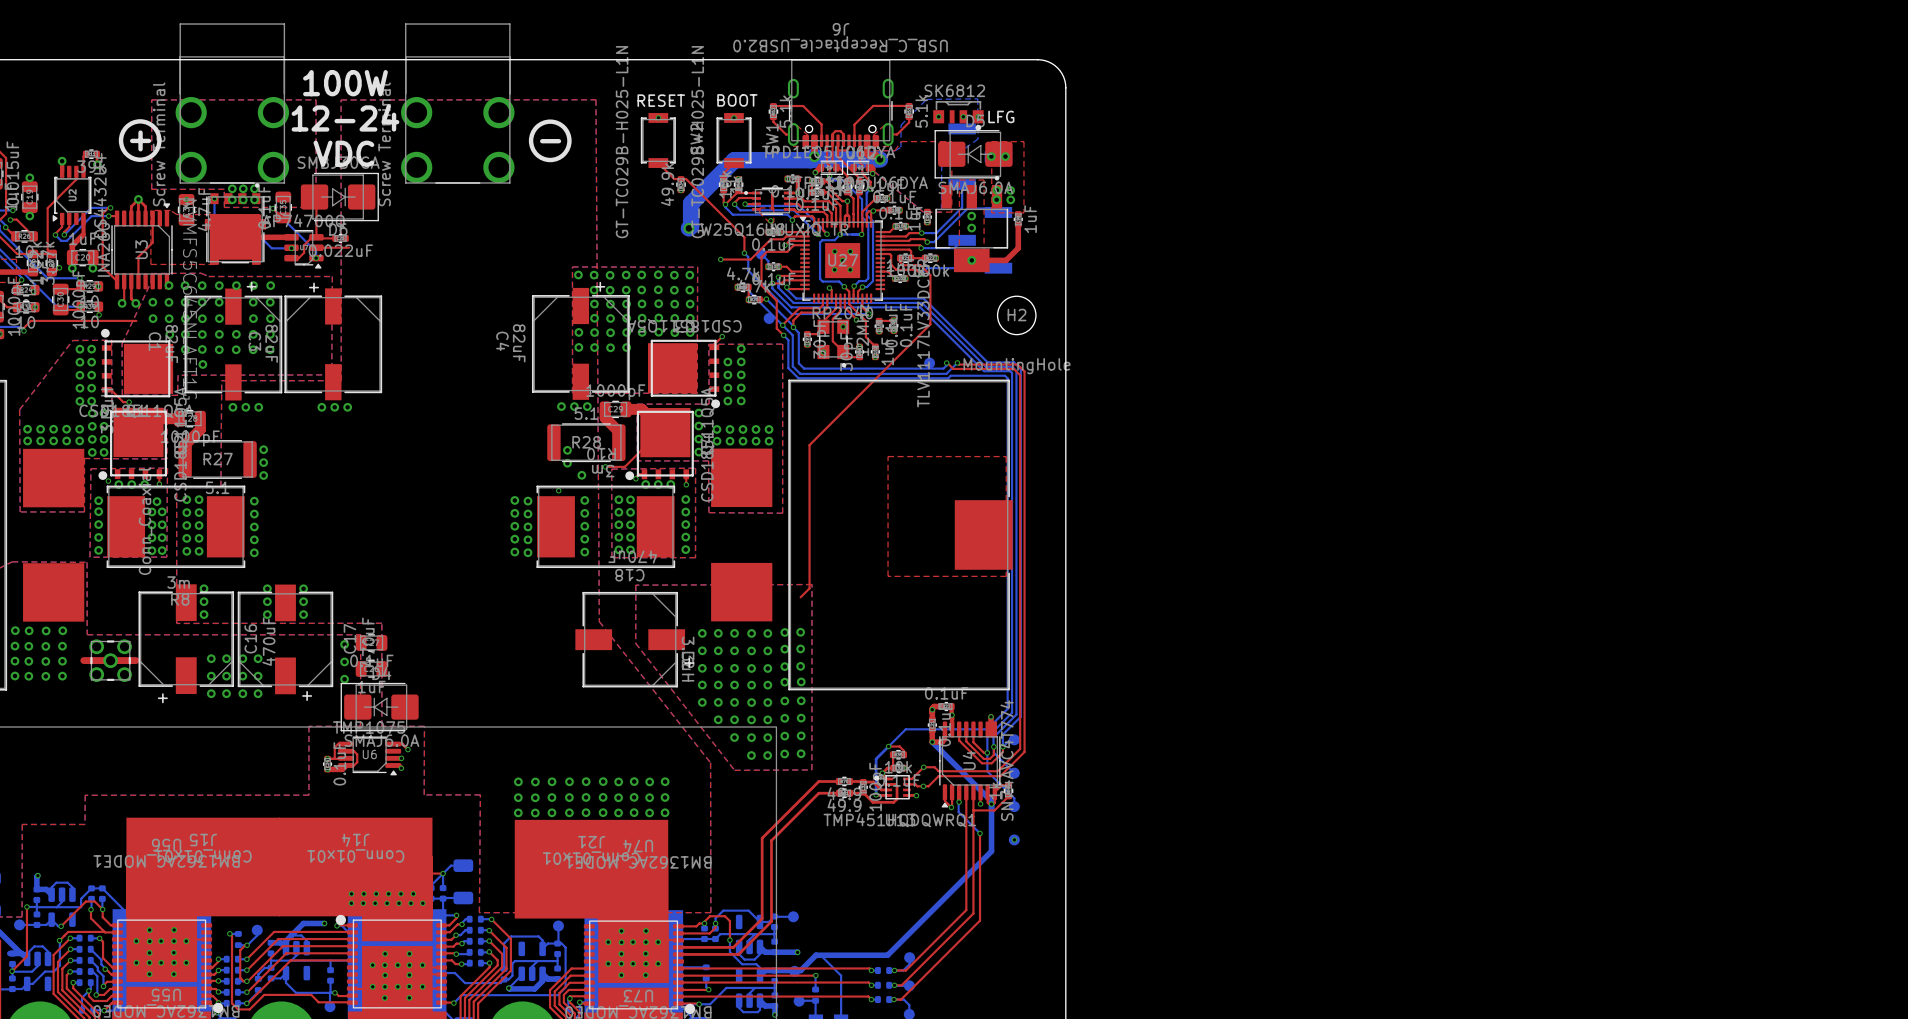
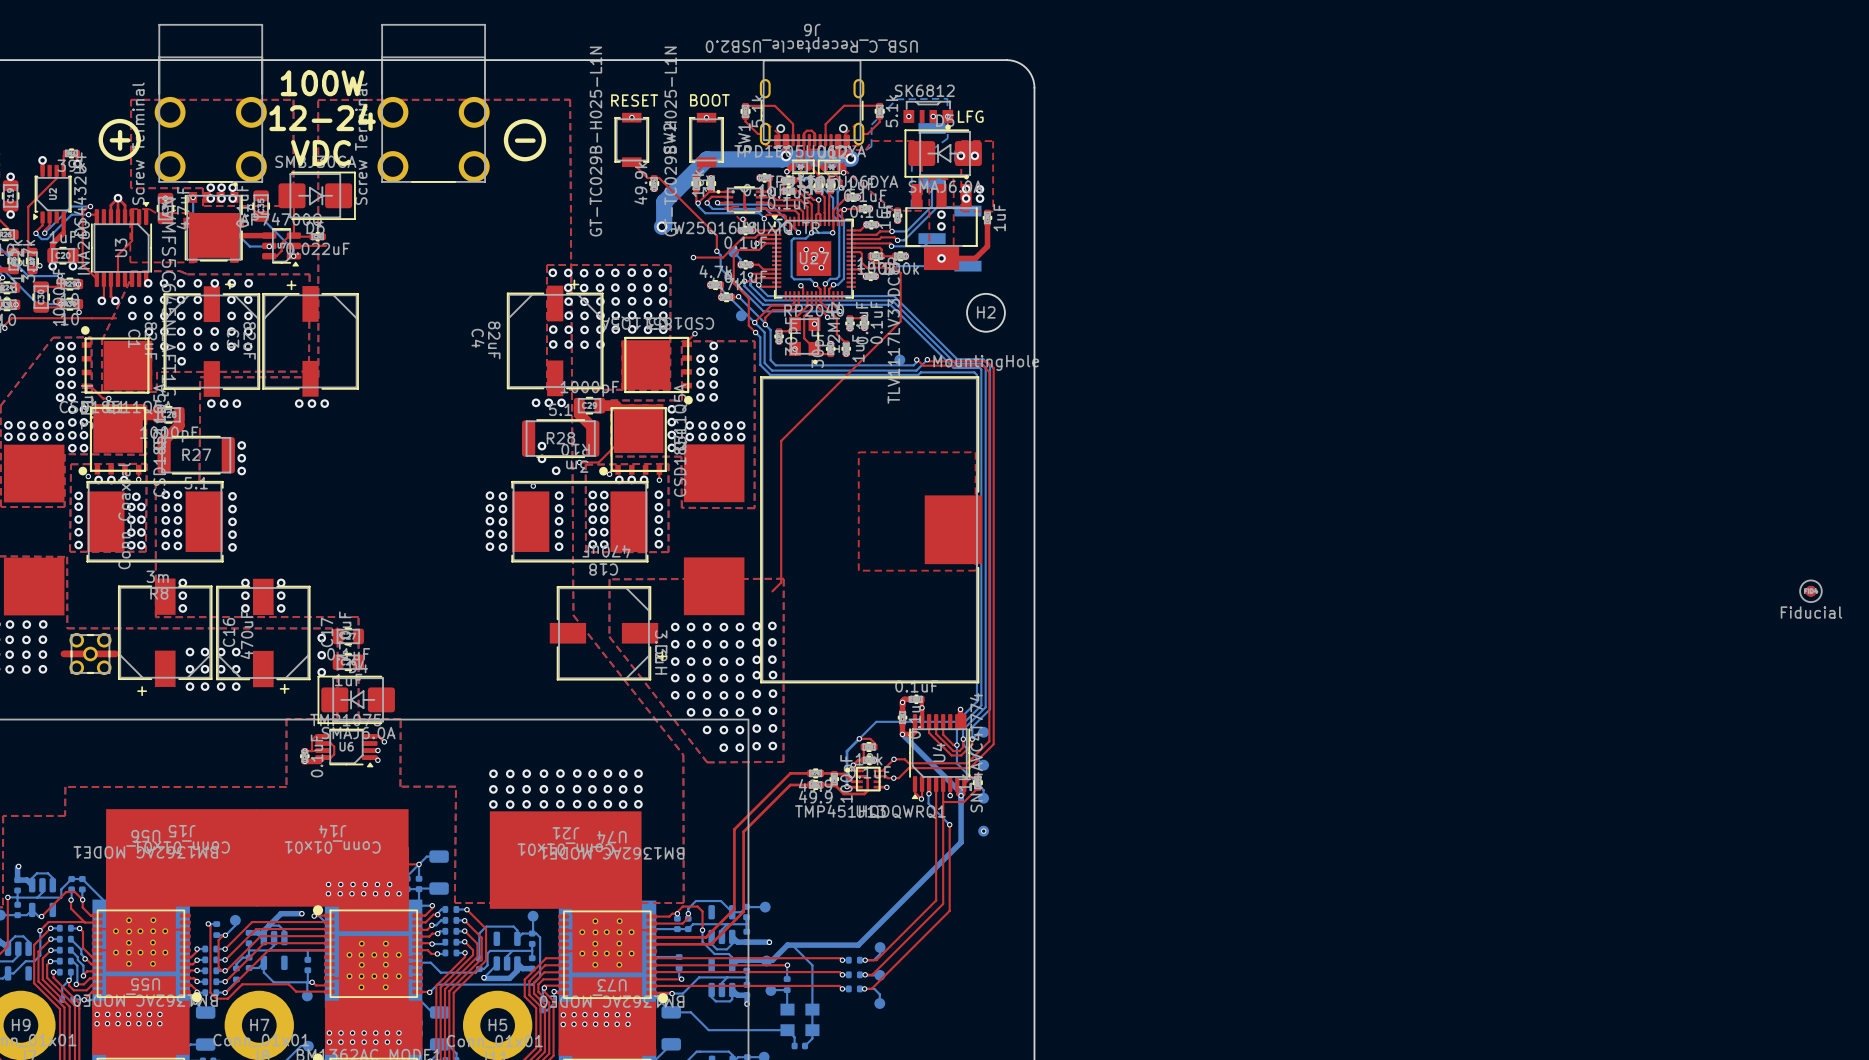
part: none -> Fiducial (1810, 591)

